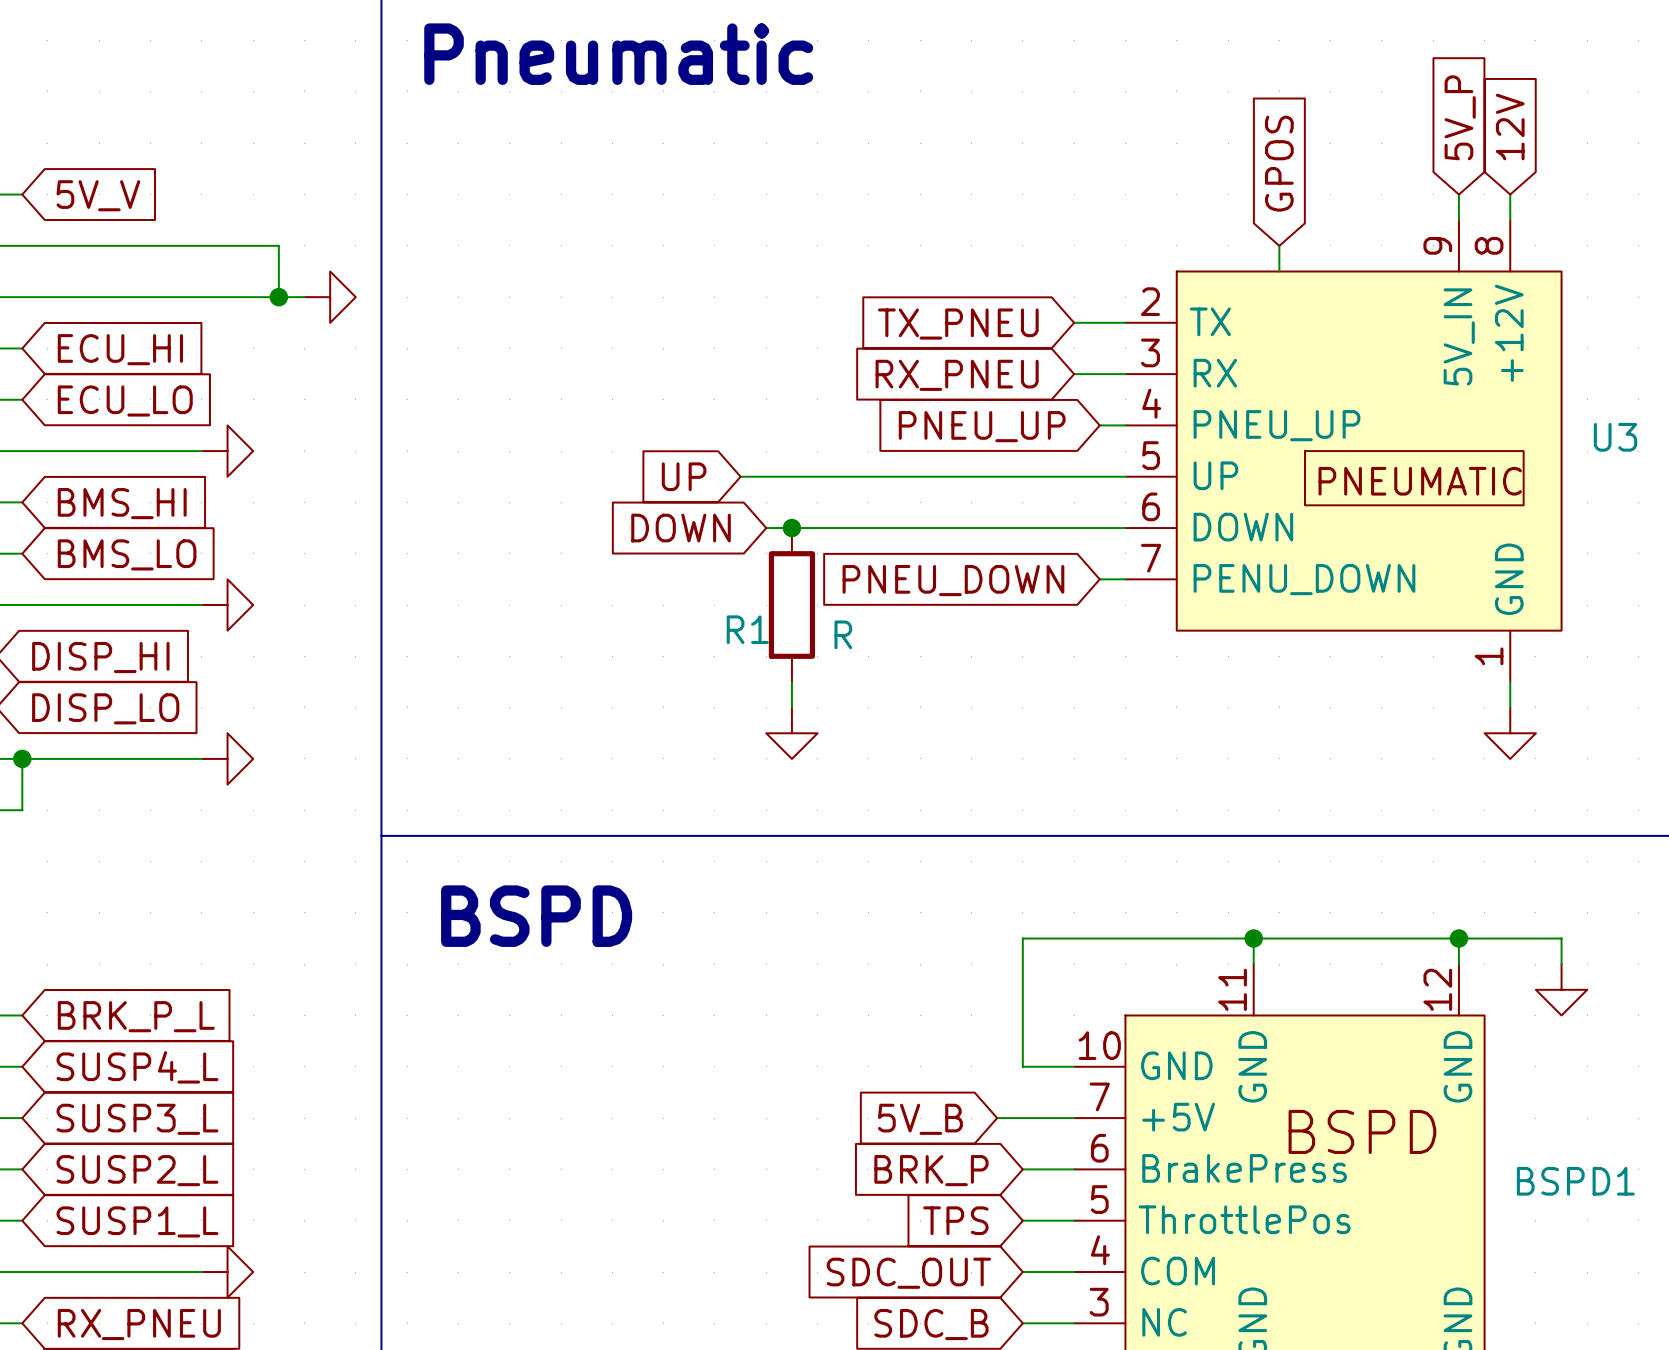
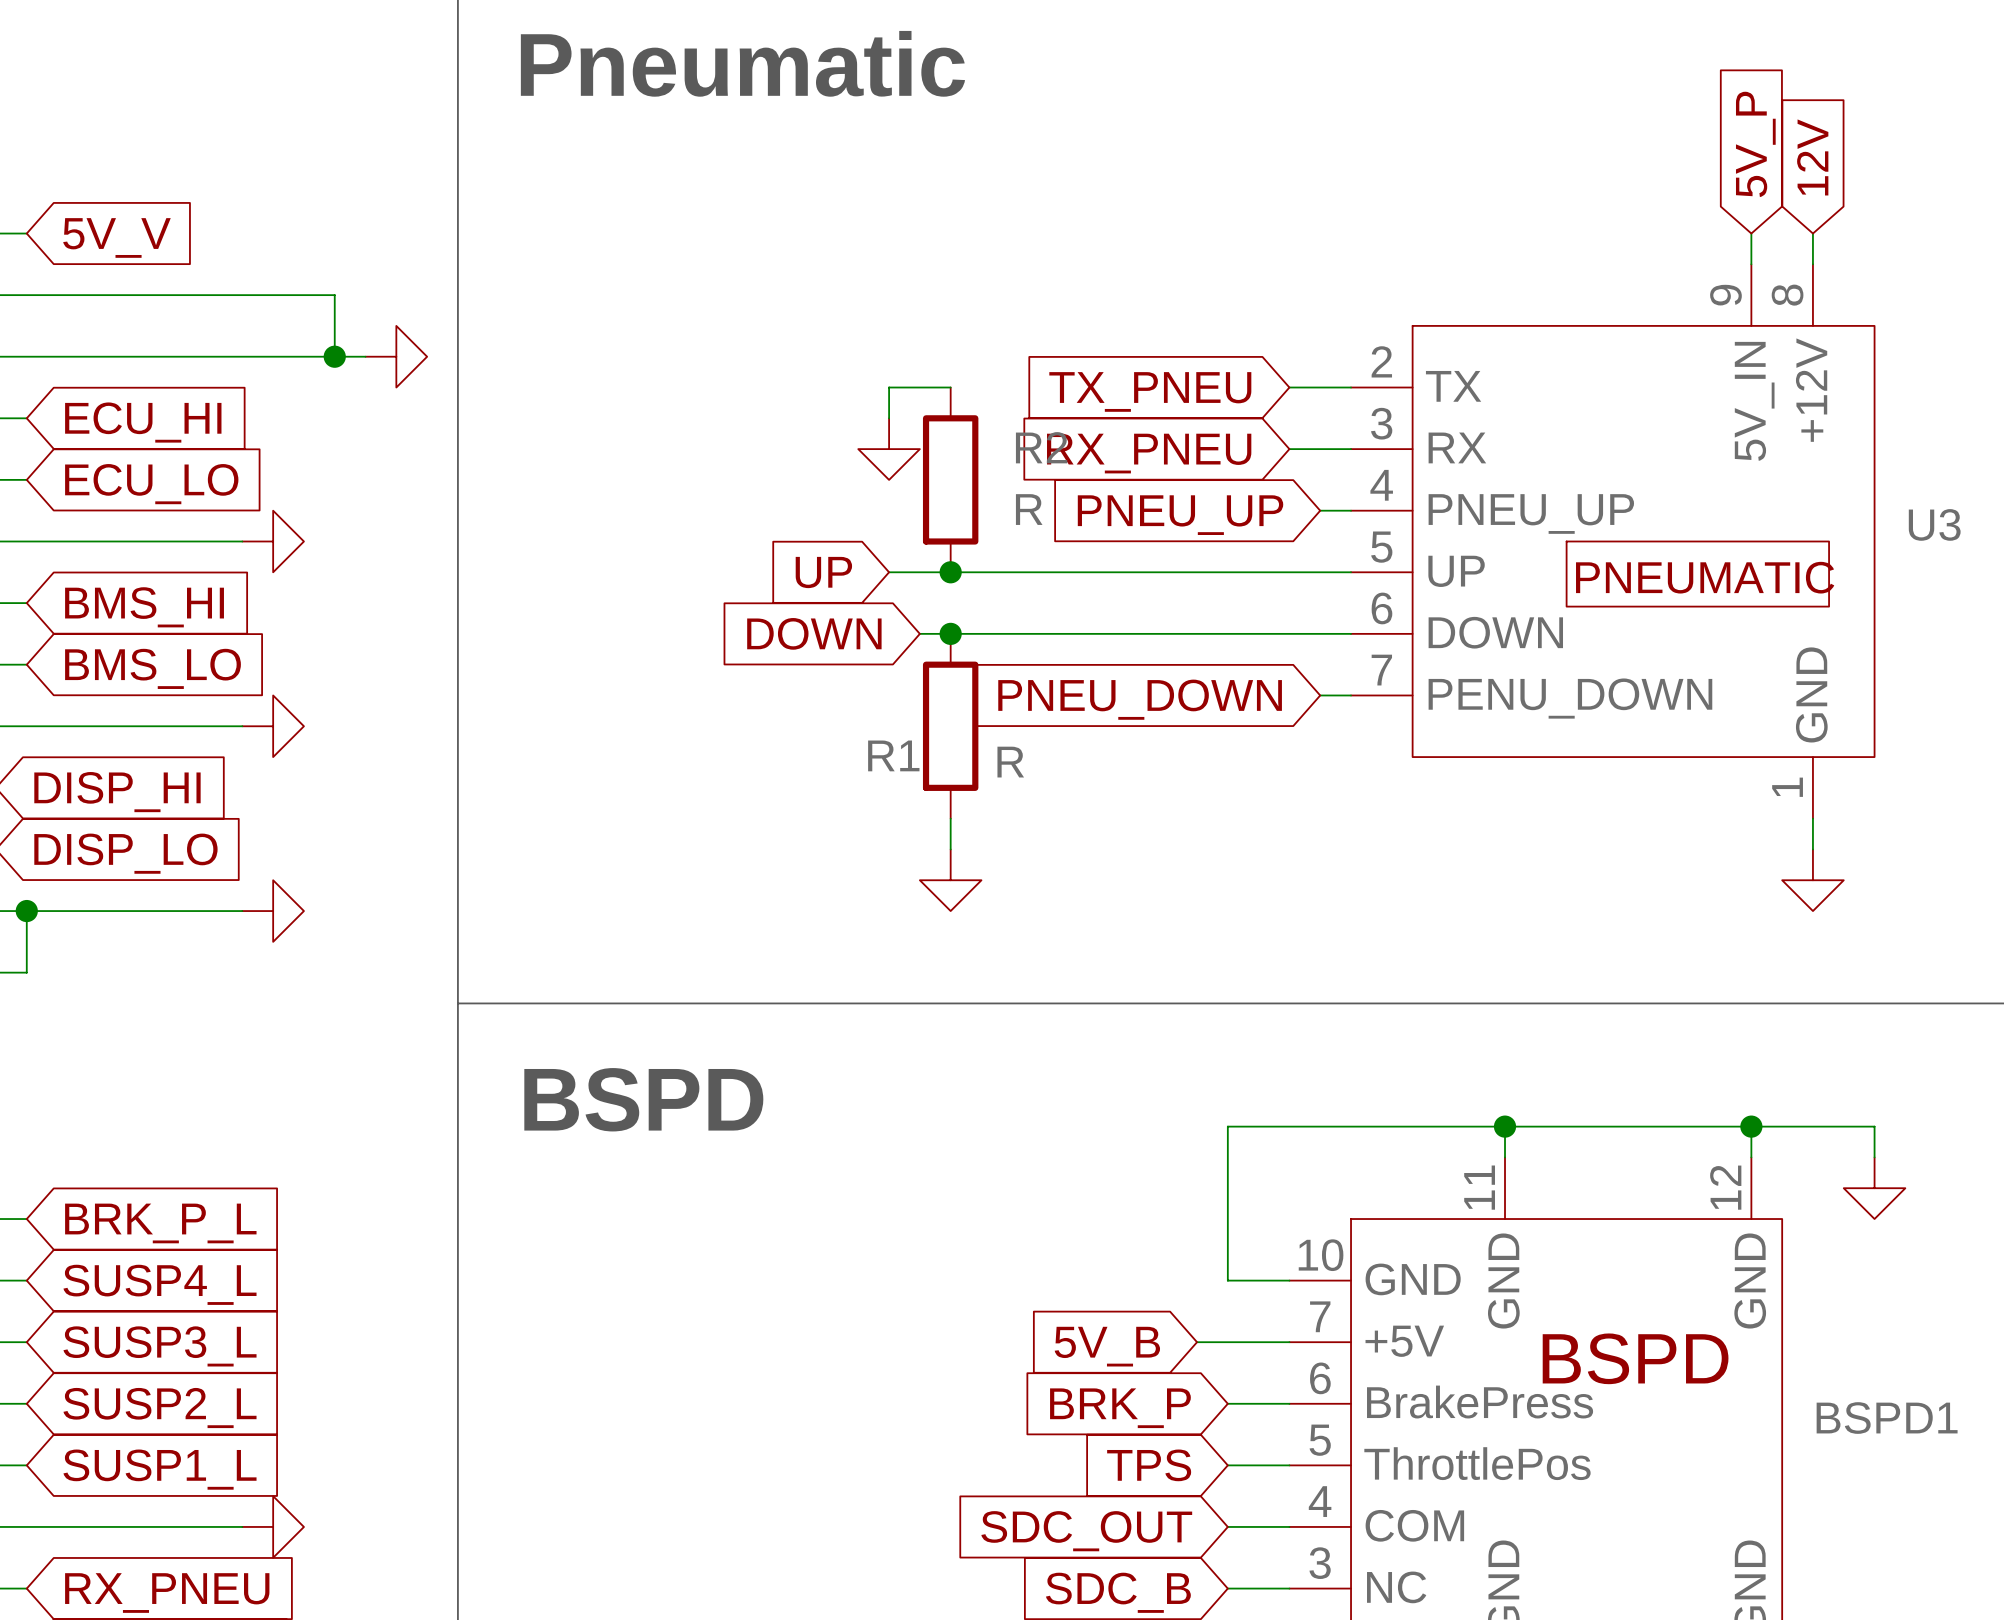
global label: GPOS (1279, 163) -> none
wire: (1279, 245) (1279, 271) -> none
wire: none -> (950, 387) (889, 387) (889, 418)
power symbol: none -> (889, 449)
R2: none -> R (950, 479)
junction: none -> (950, 572)

